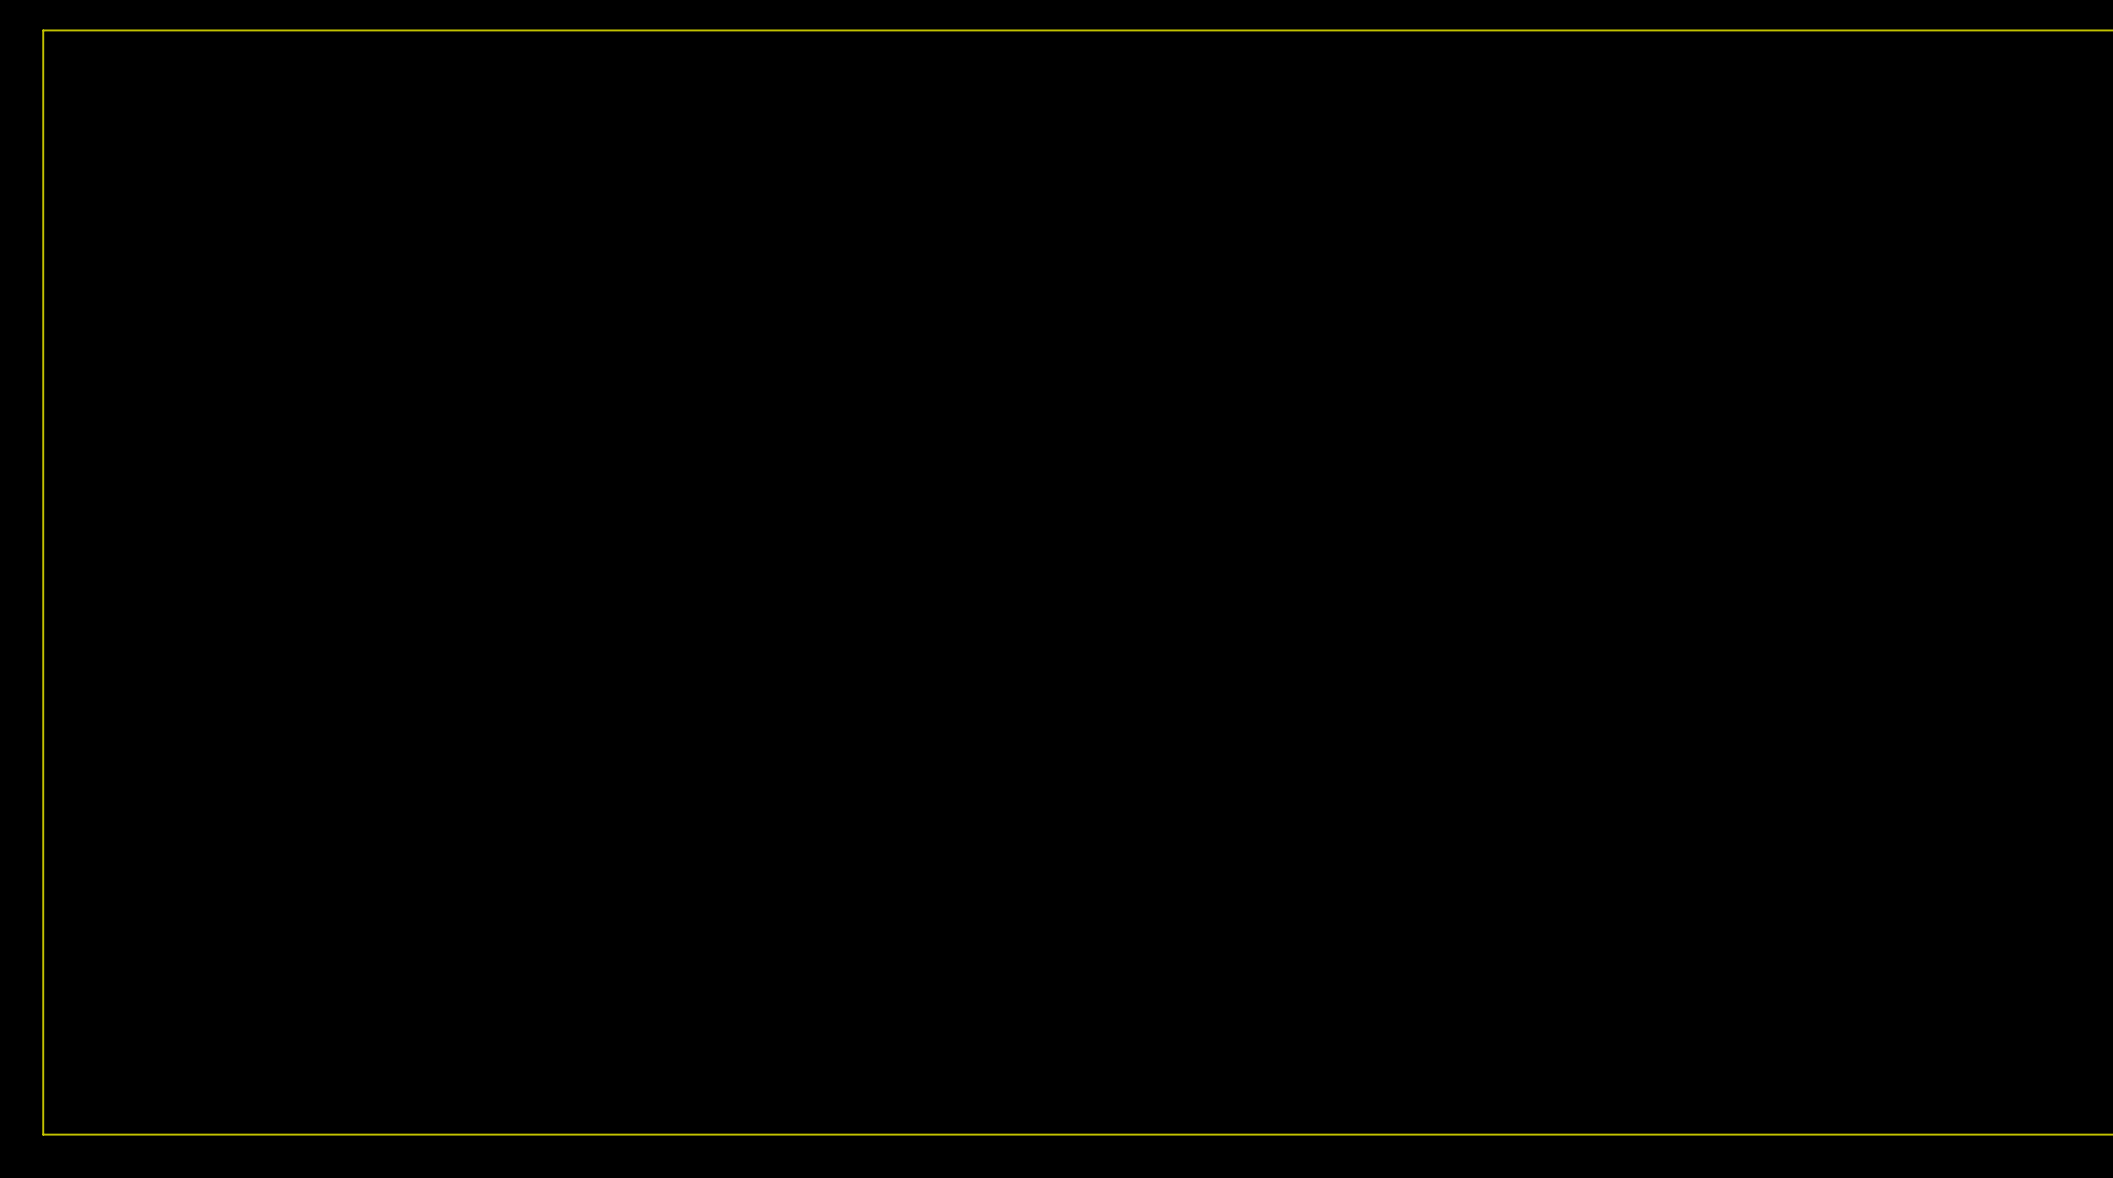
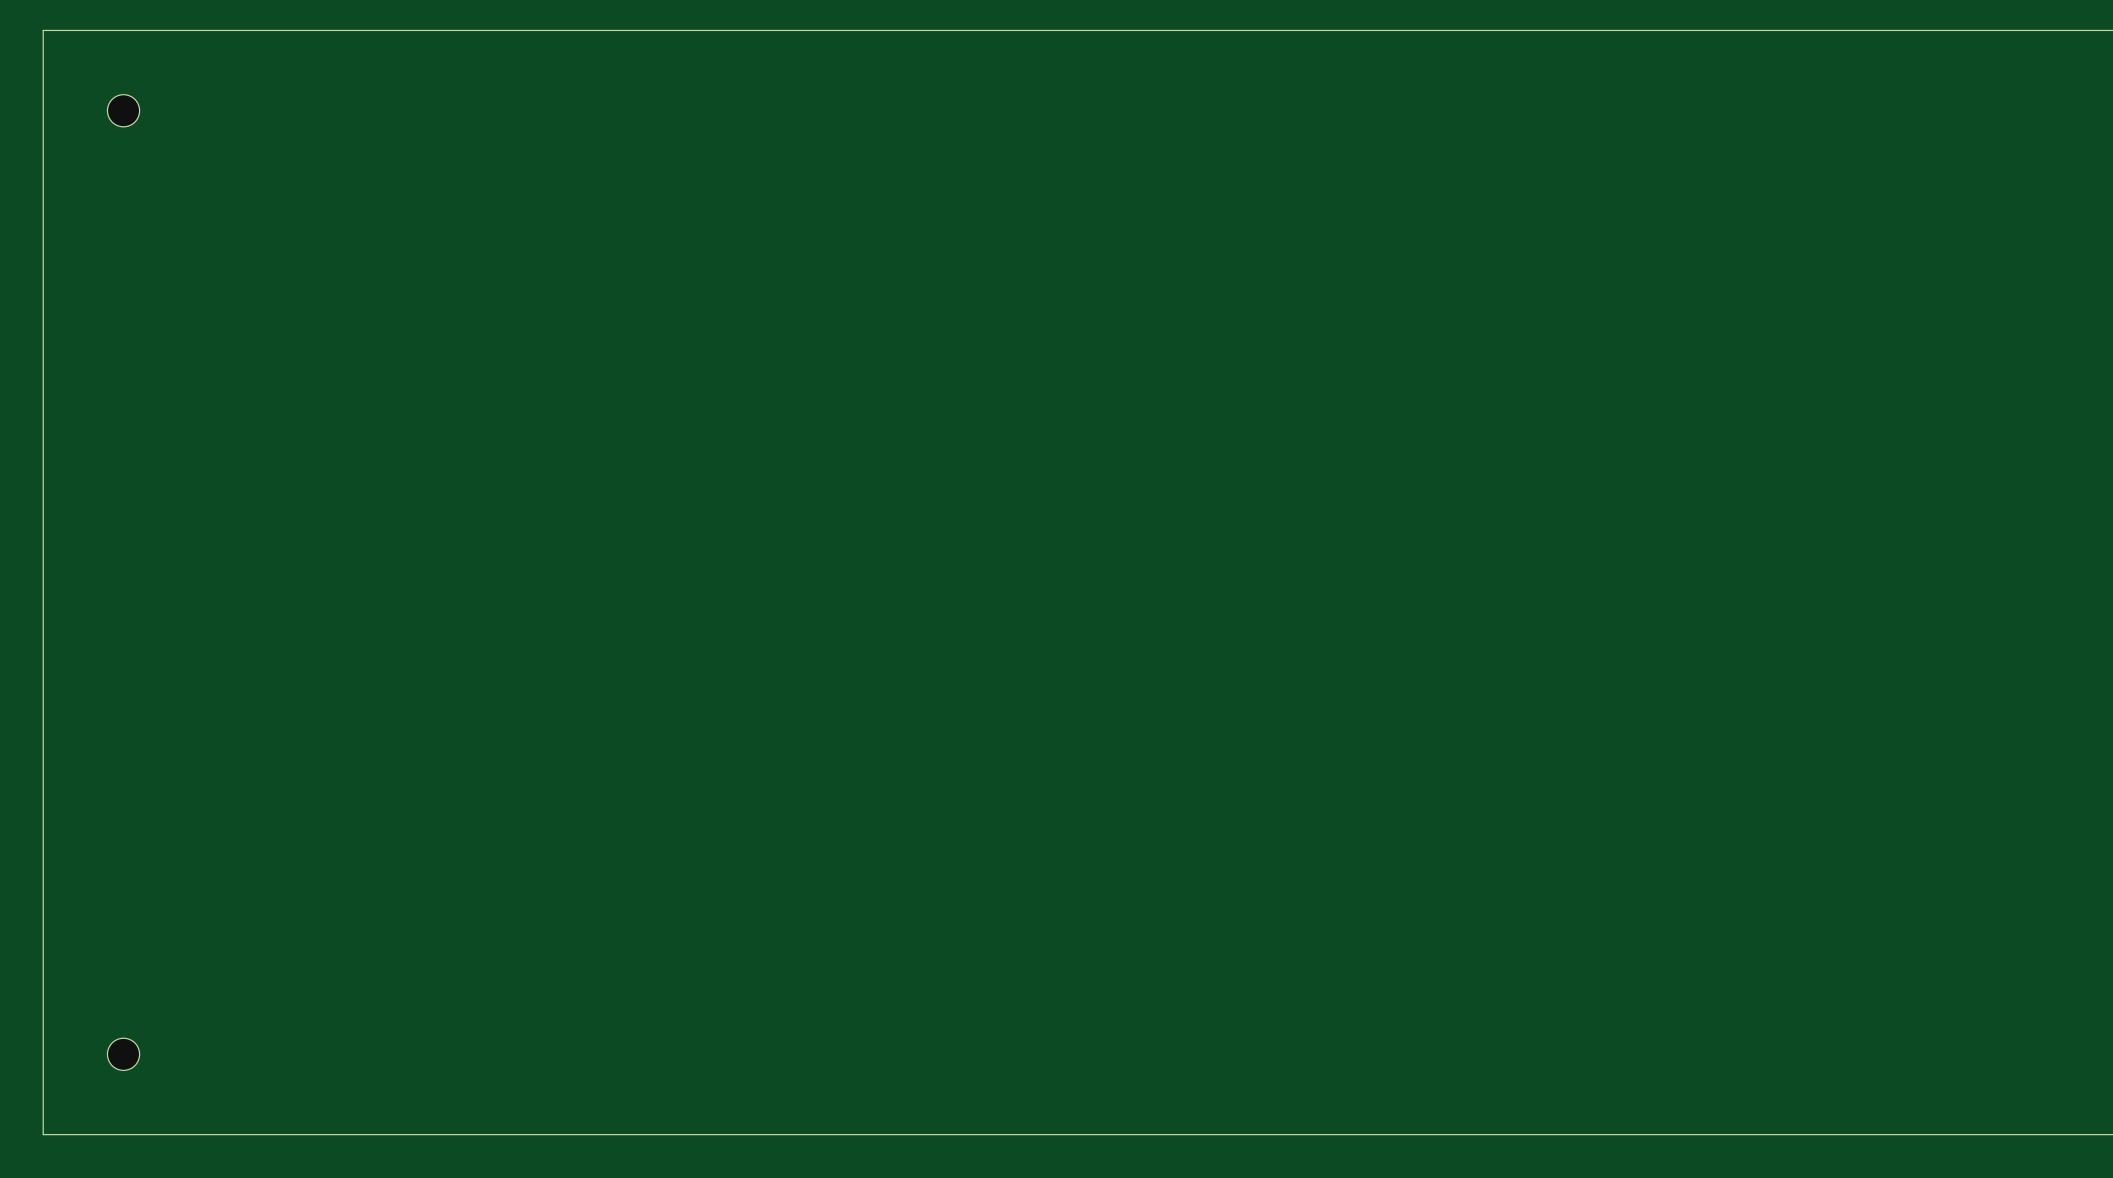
part: none -> (123, 110)
part: none -> (123, 1054)

